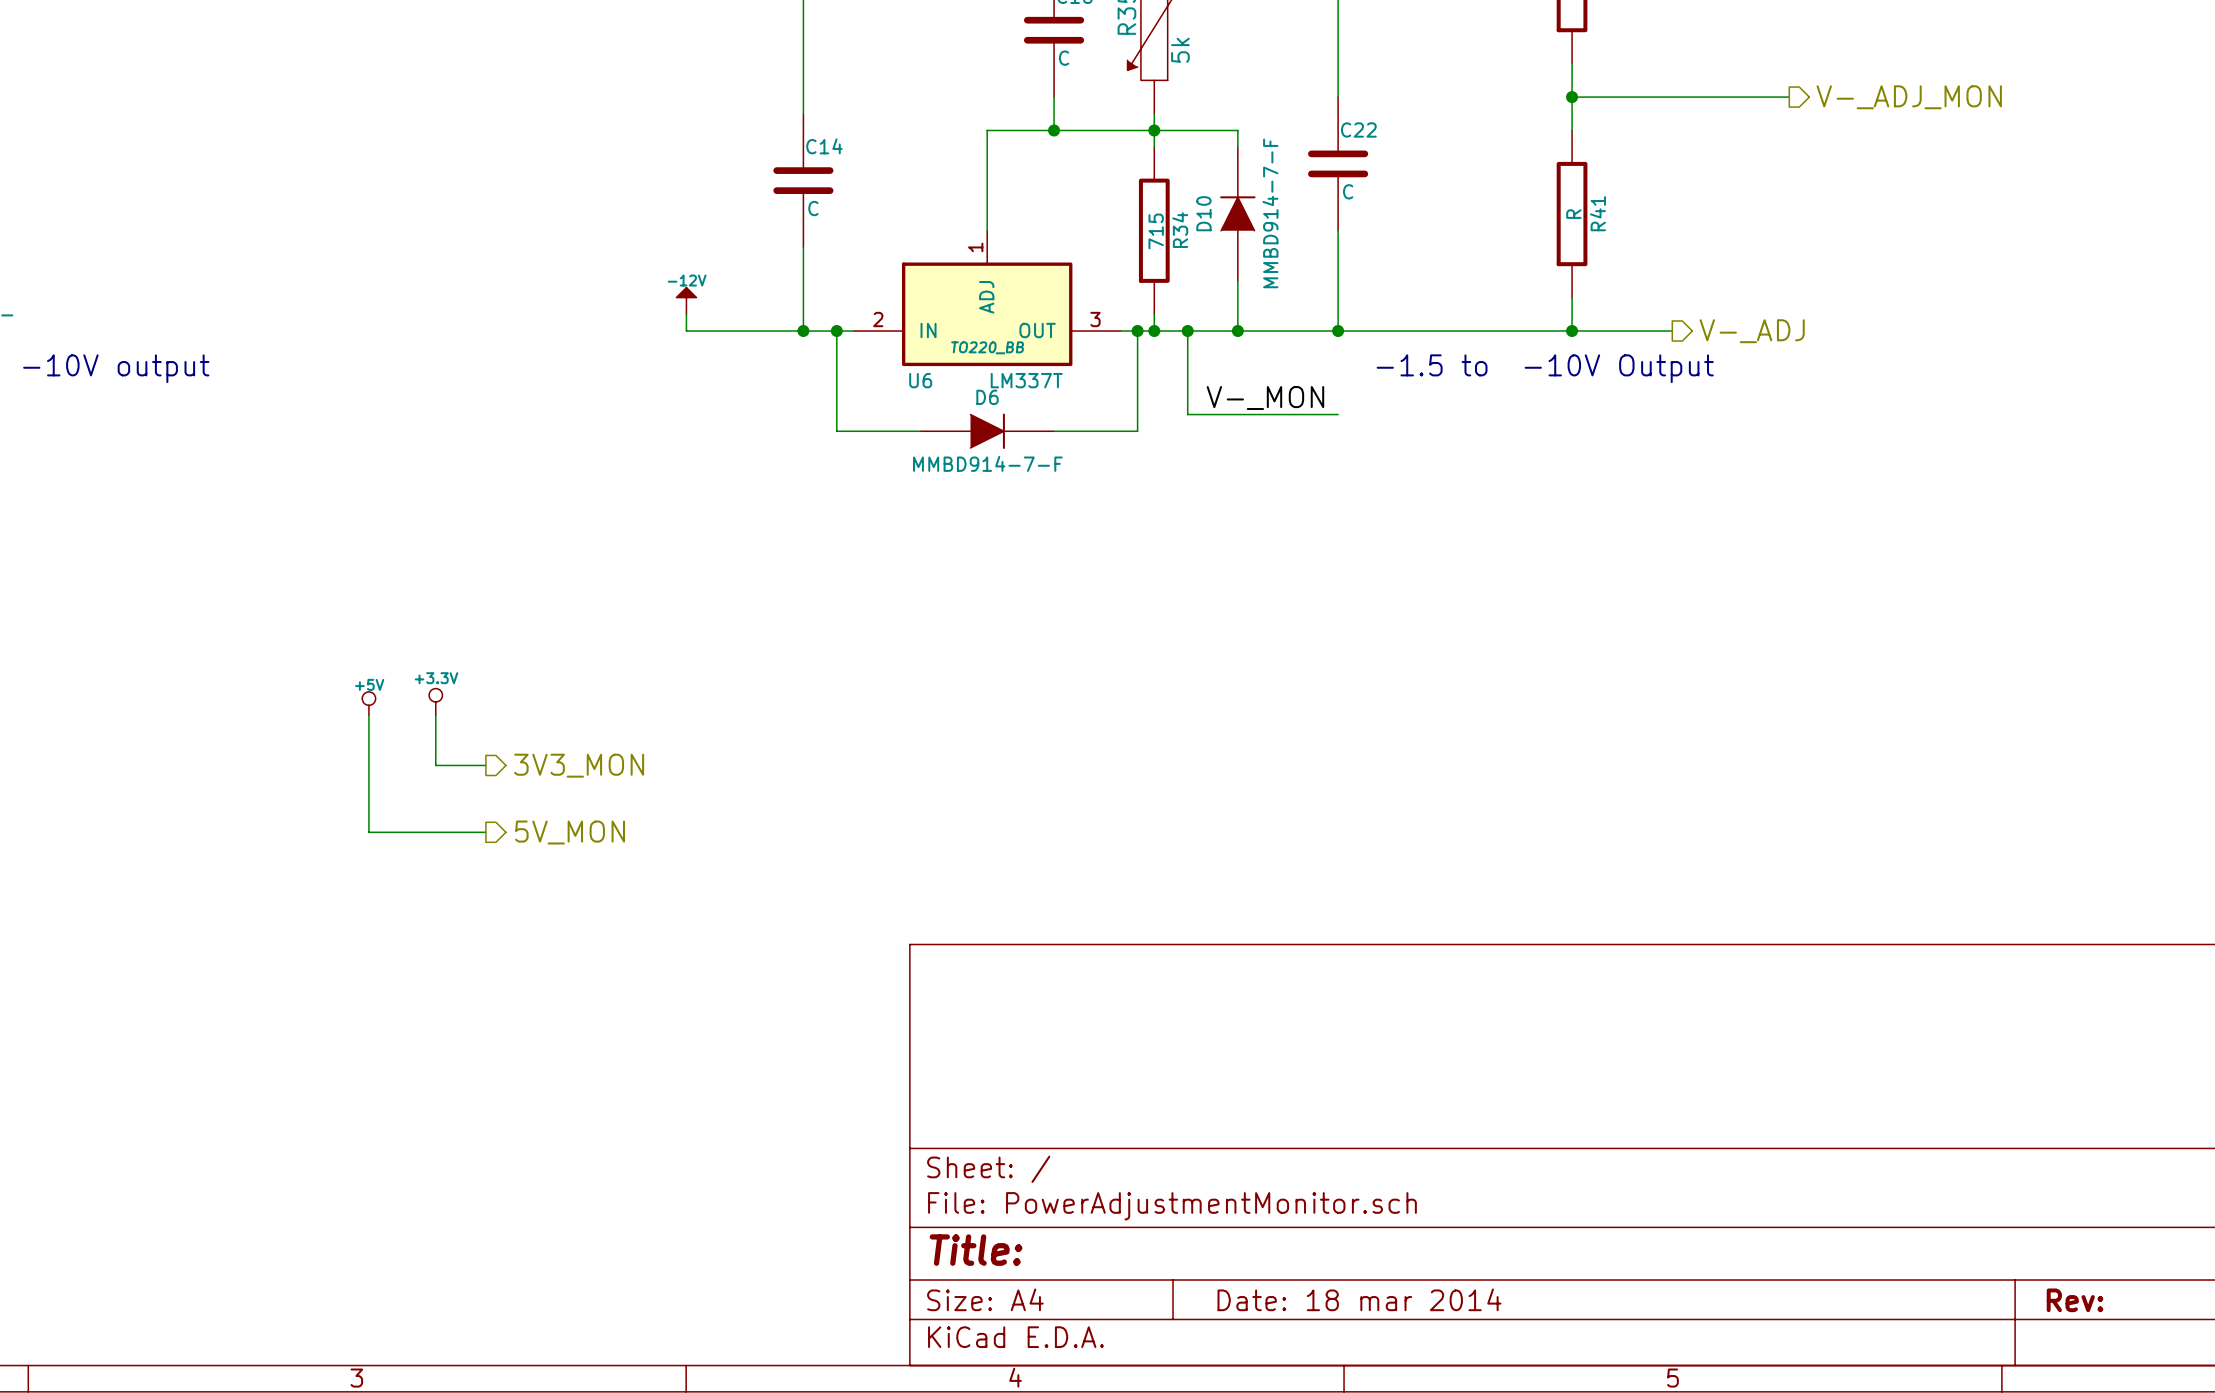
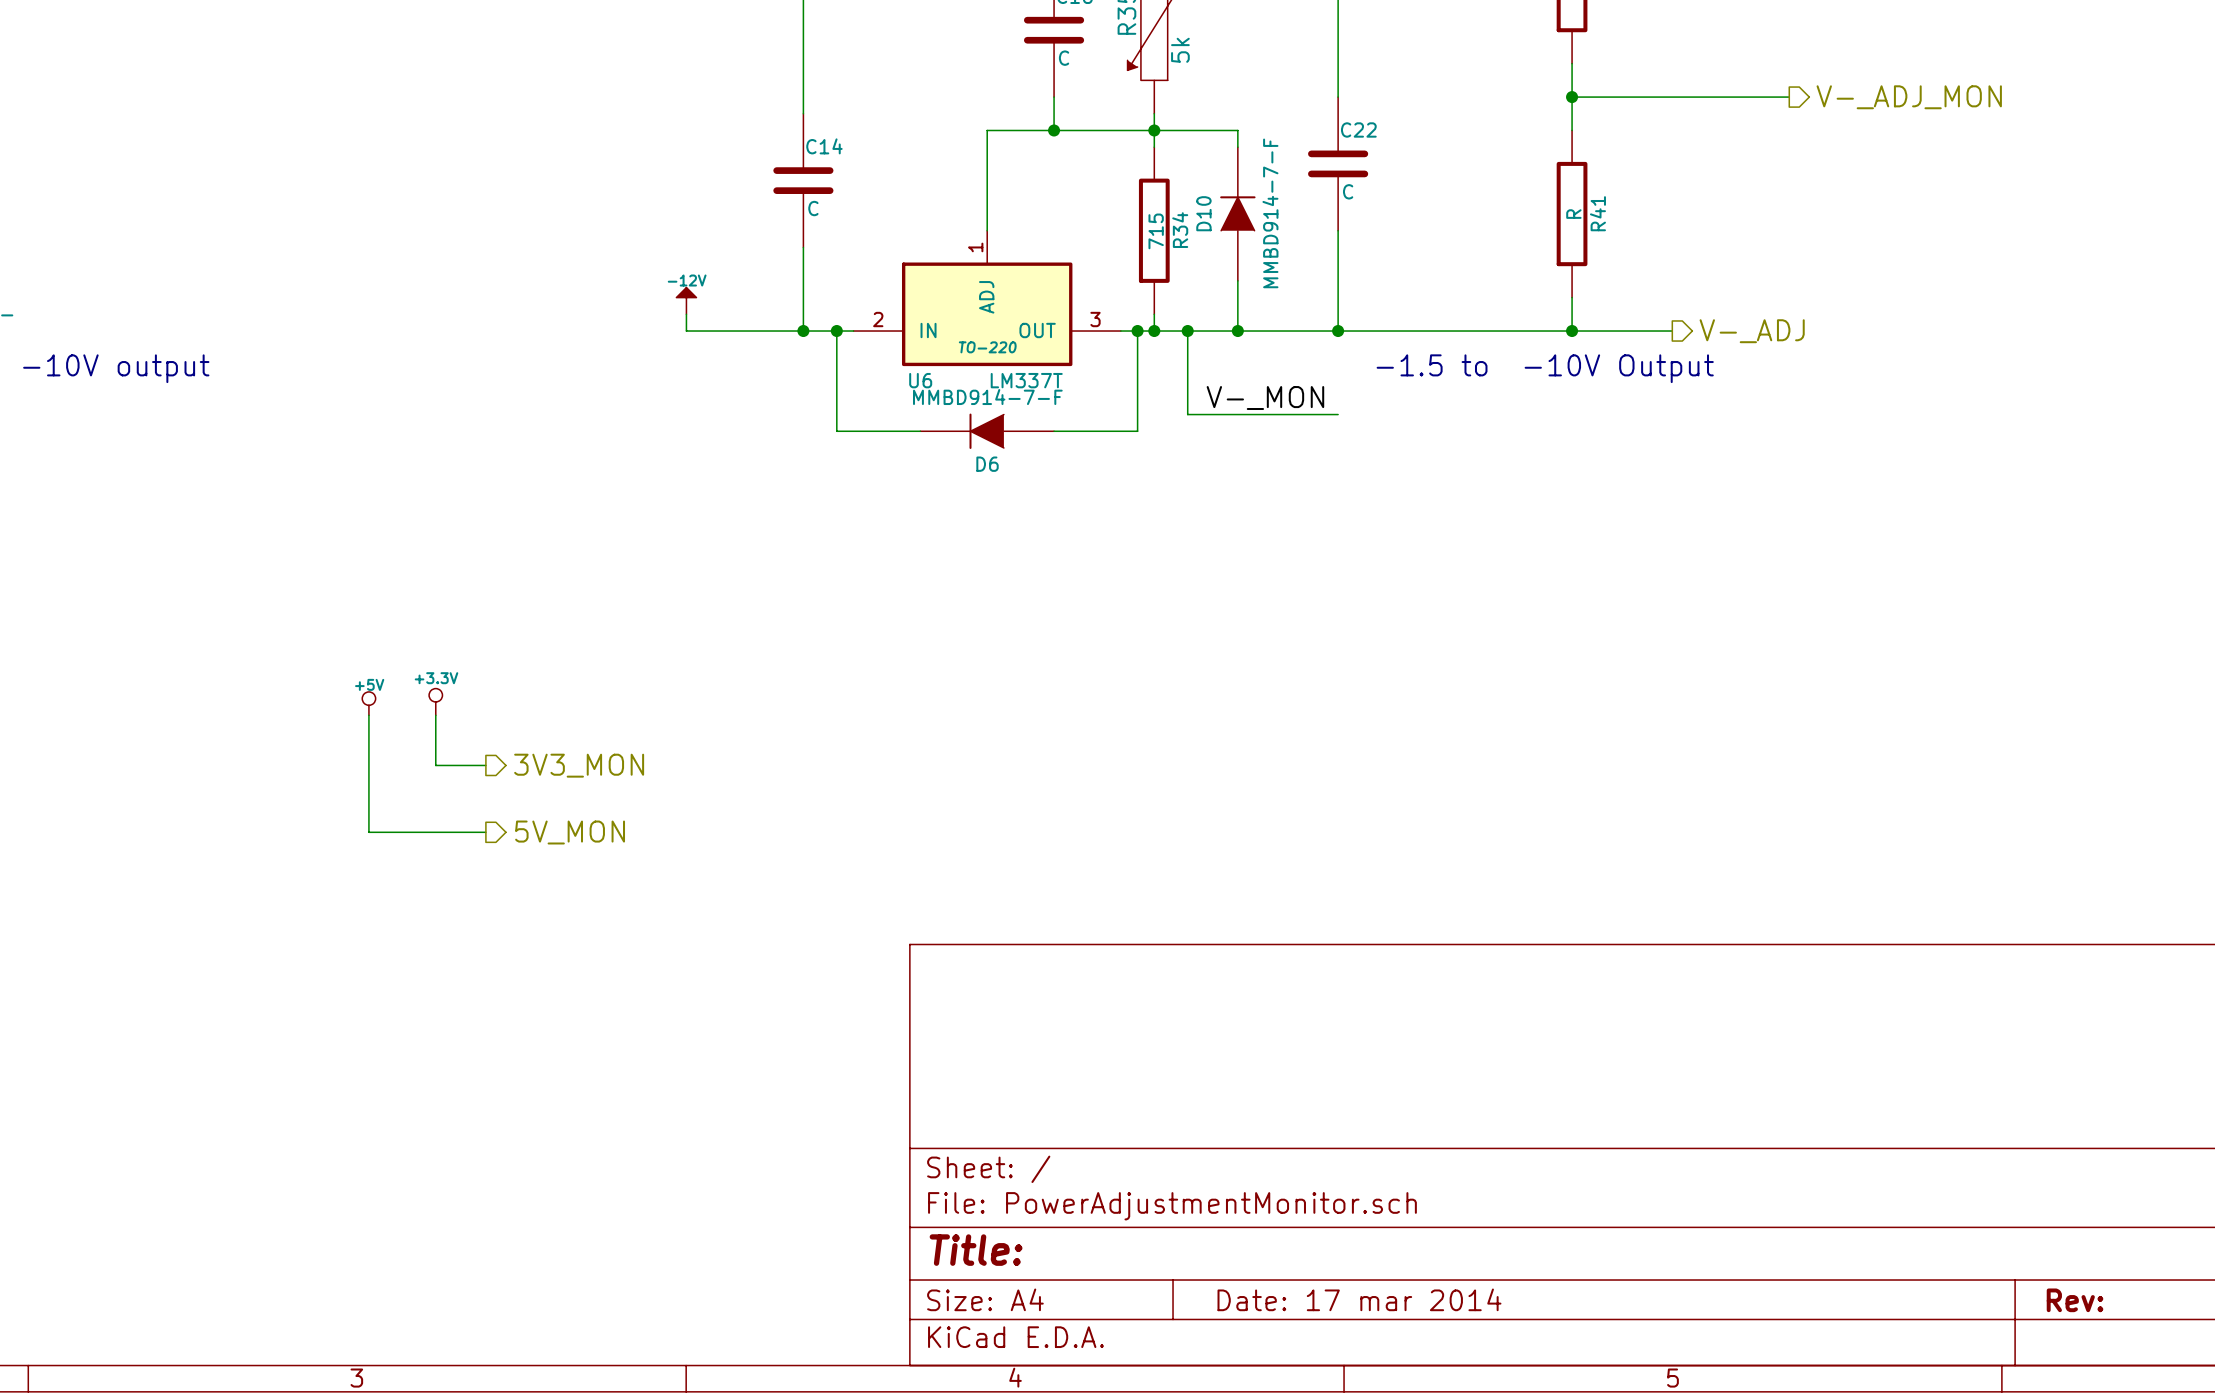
U6 text: TO220_BB (987, 347) -> TO-220 (987, 347)
D6 rotation: 0° (987, 431) -> 180° (986, 431)
title block: Date: 18 mar 2014 (1359, 1299) -> Date: 17 mar 2014 (1359, 1299)

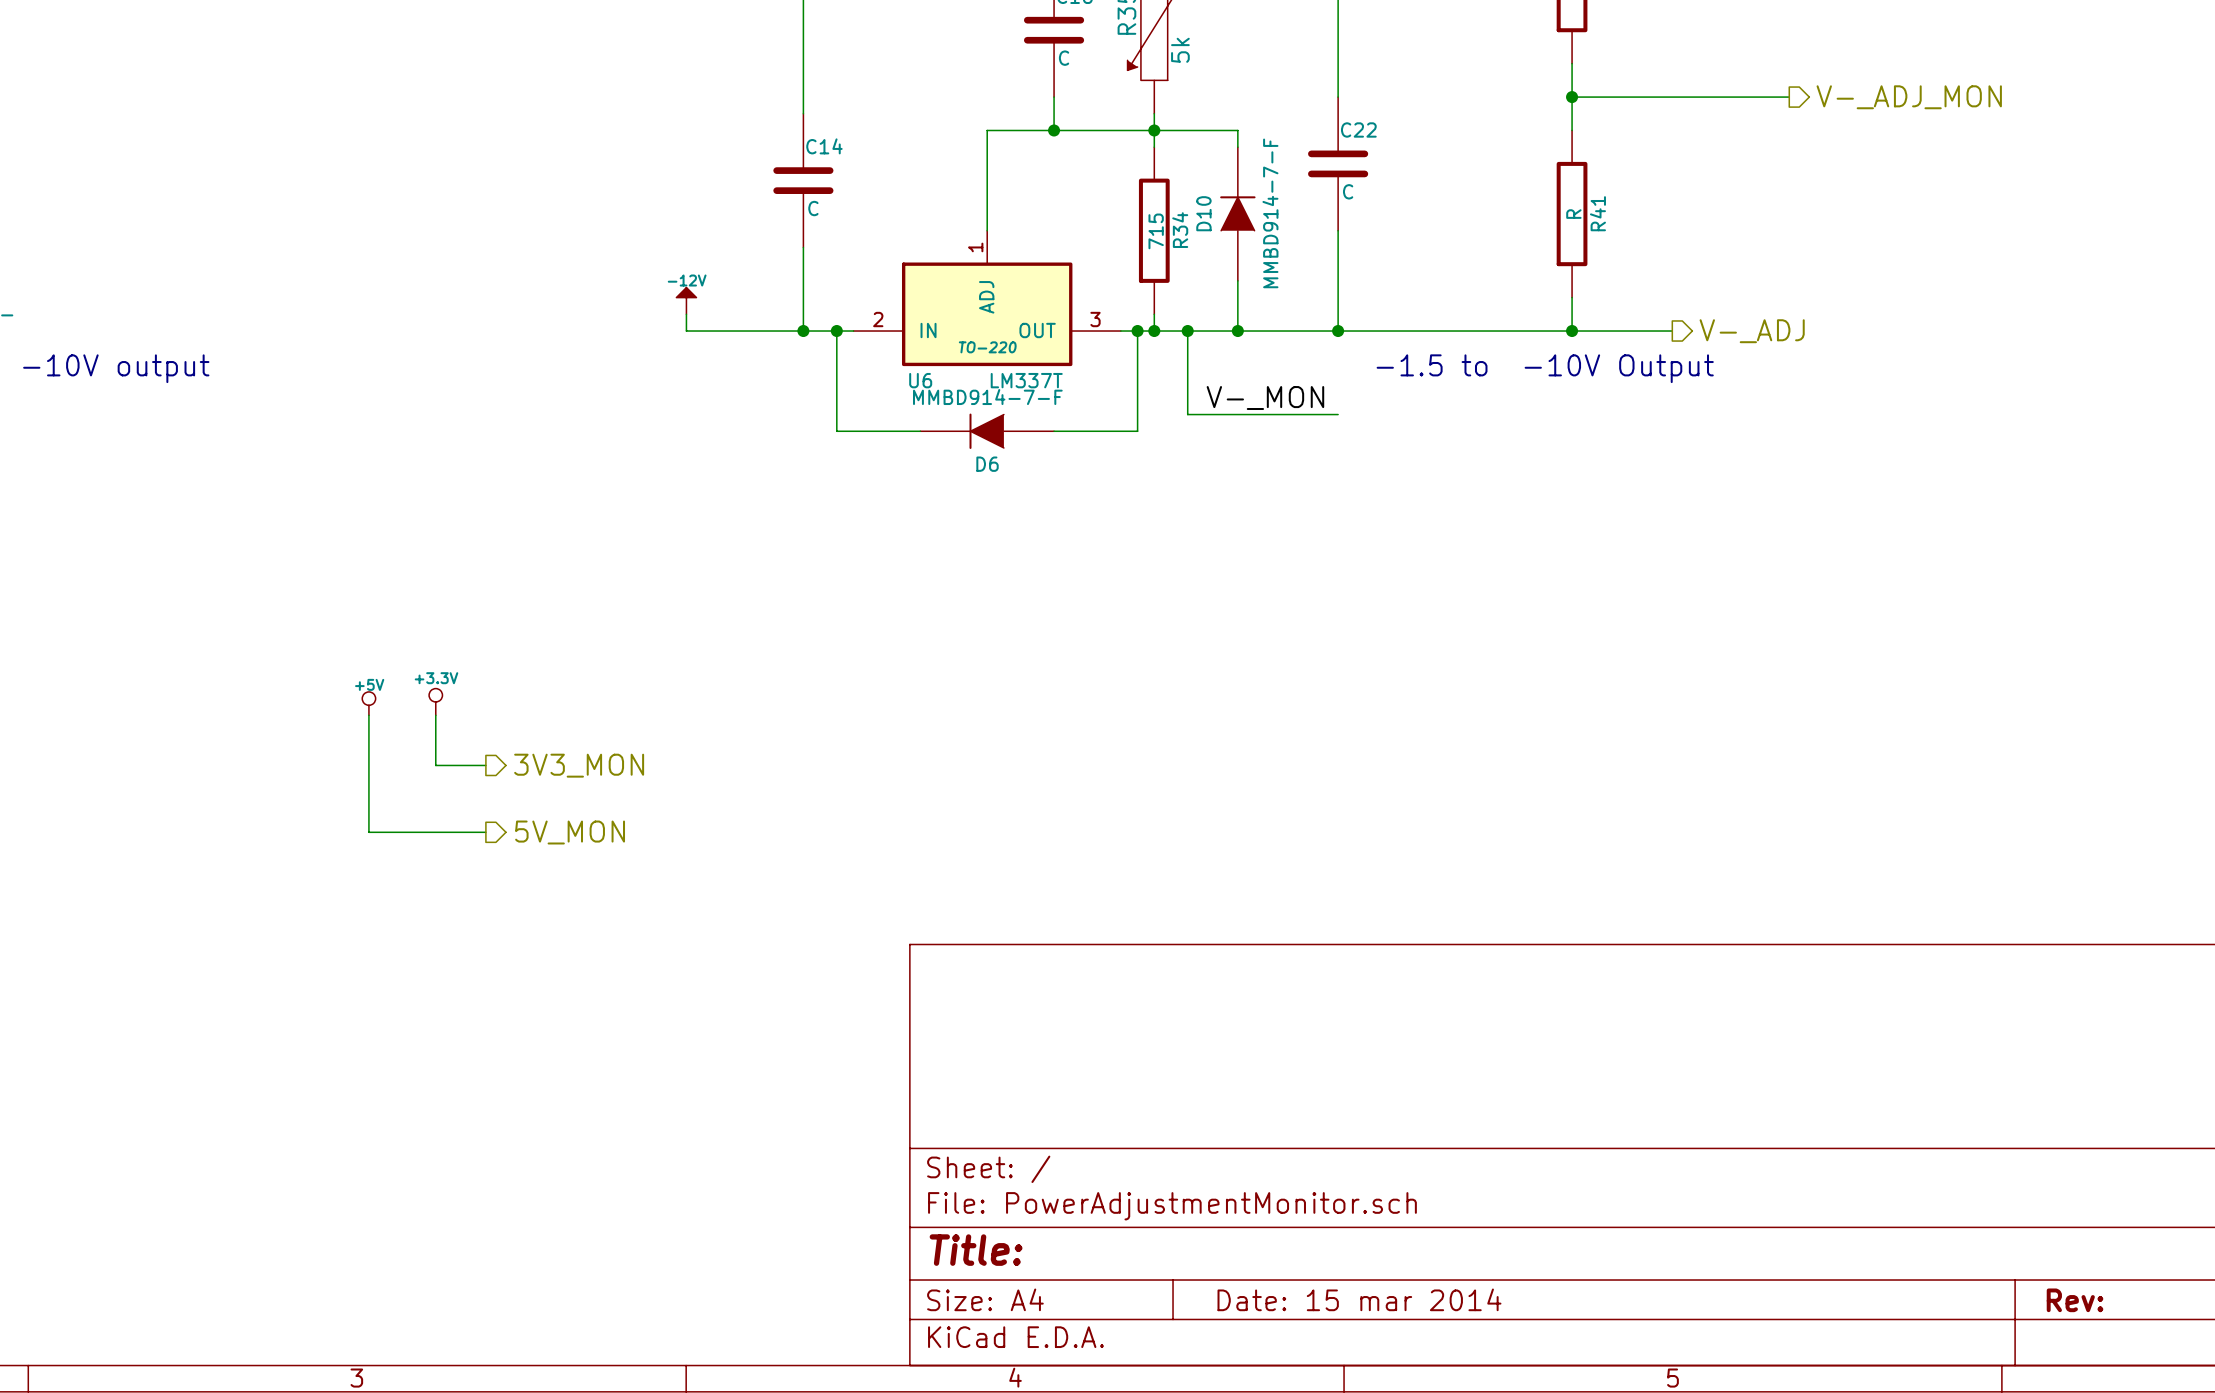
title block: Date: 17 mar 2014 (1359, 1299) -> Date: 15 mar 2014 (1359, 1299)

